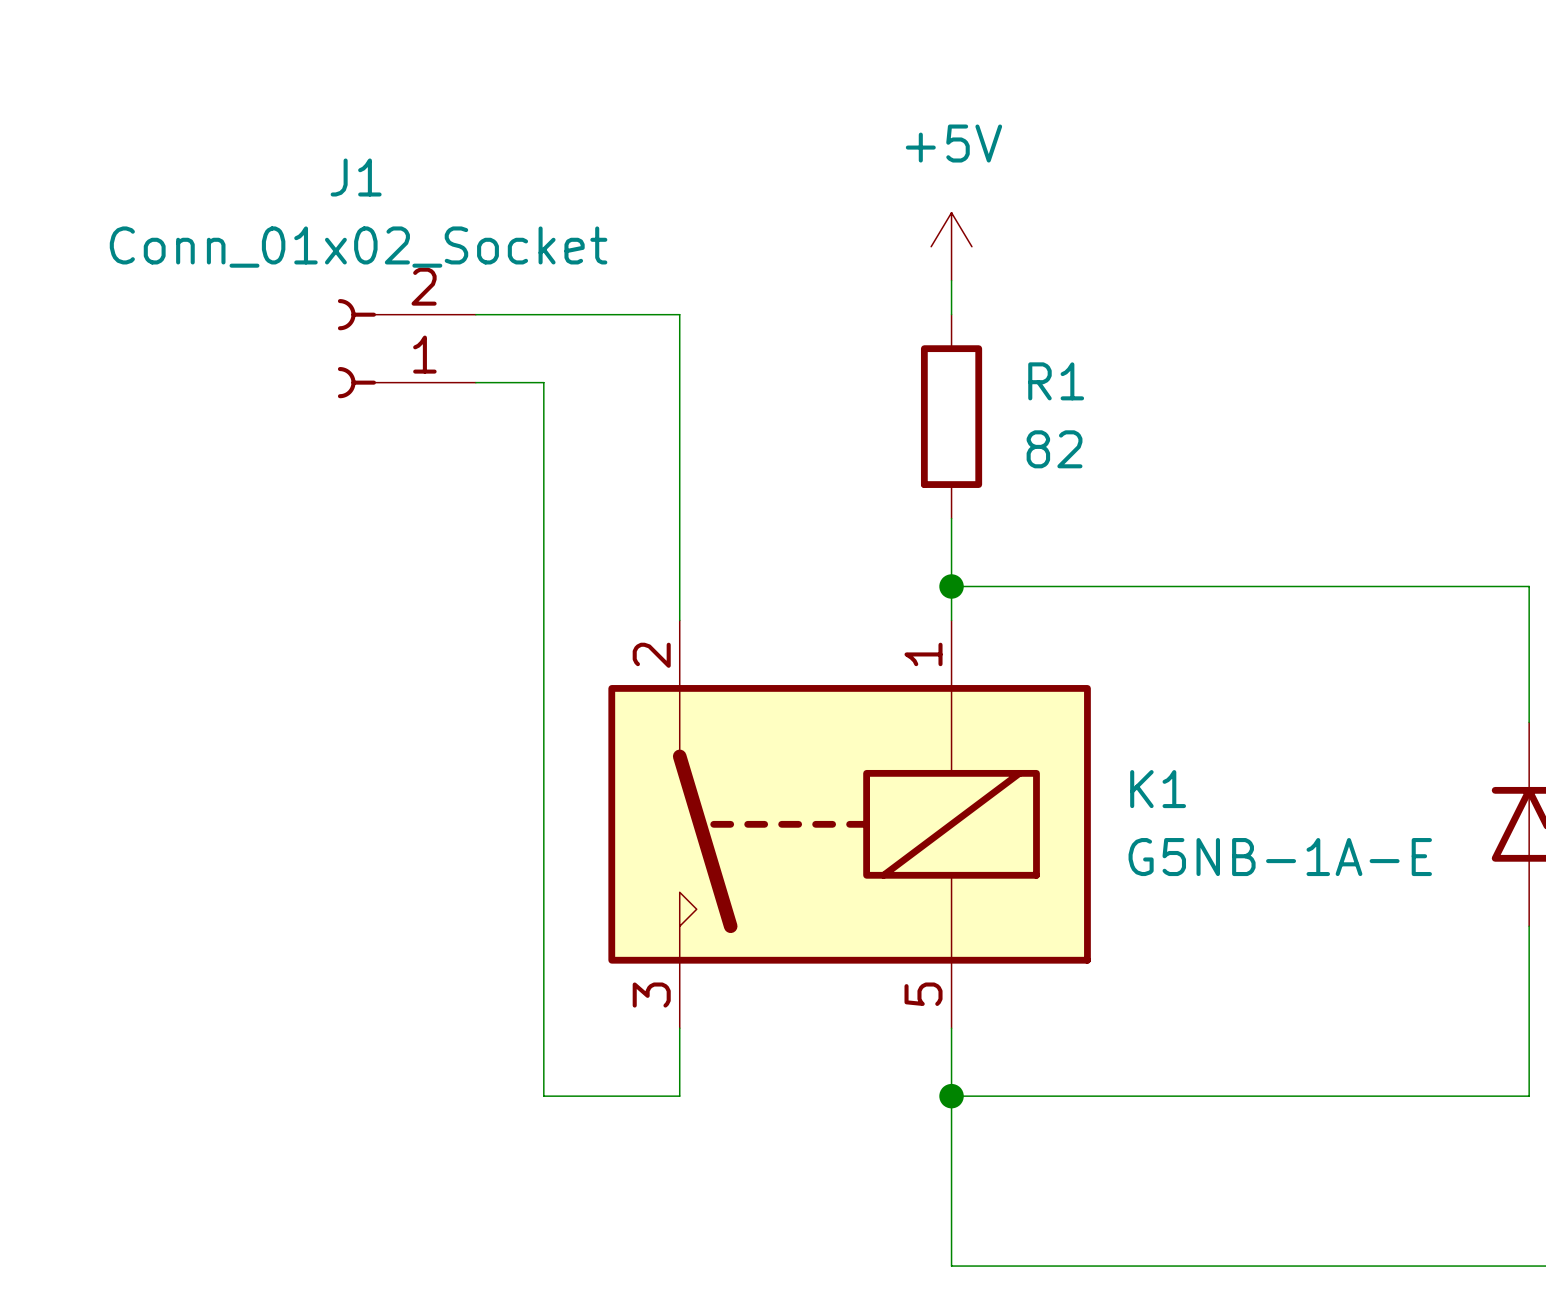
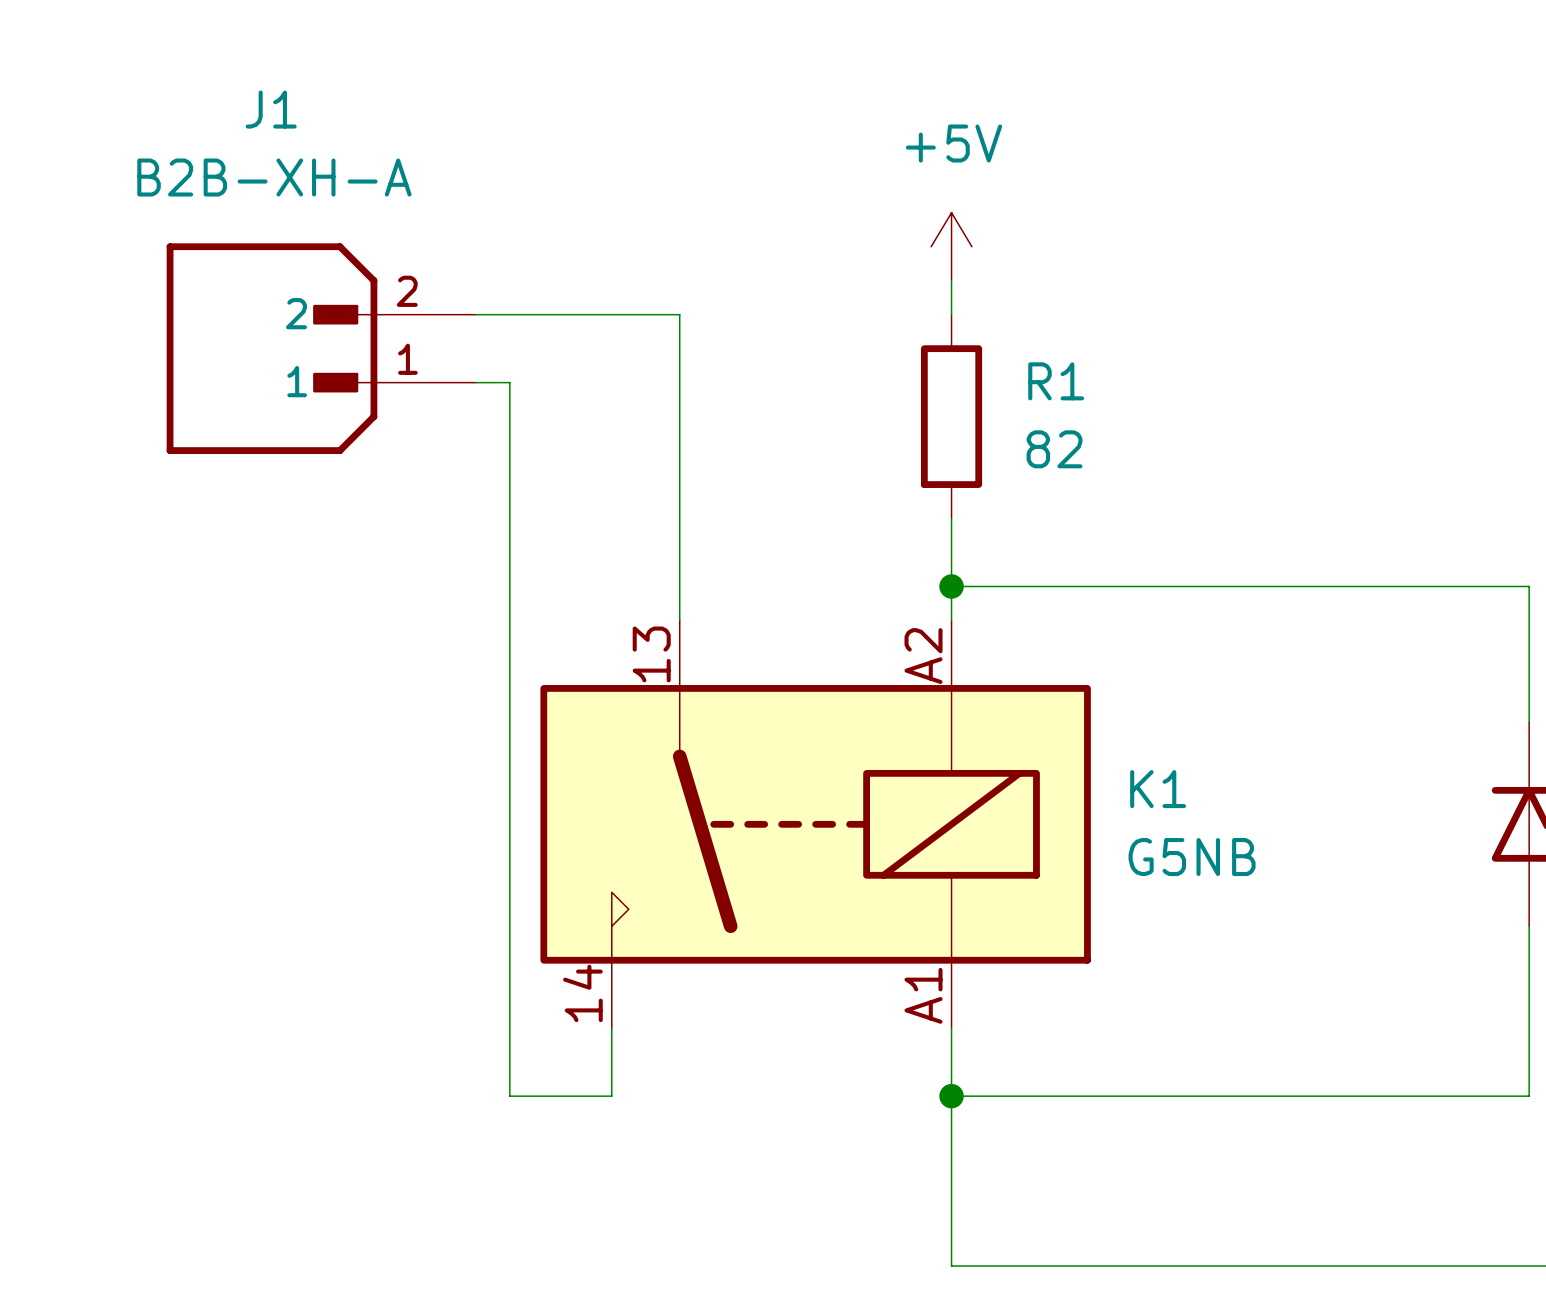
J1 name position: J1 (356, 177) -> J1 (271, 109)
J1 value: Conn_01x02_Socket (358, 247) -> B2B-XH-A (274, 177)
J1 symbol: [337, 299, 476, 399] -> [166, 243, 476, 454]
wire: (509, 382) (543, 382) (543, 1096) -> (509, 382) (509, 1096) (543, 1096)
K1 symbol: [608, 620, 1091, 1029] -> [540, 620, 1091, 1029]
K1 value: G5NB-1A-E (1280, 857) -> G5NB (1192, 857)
wire: (679, 1028) (679, 1096) (611, 1096) -> (611, 1028) (611, 1096)

